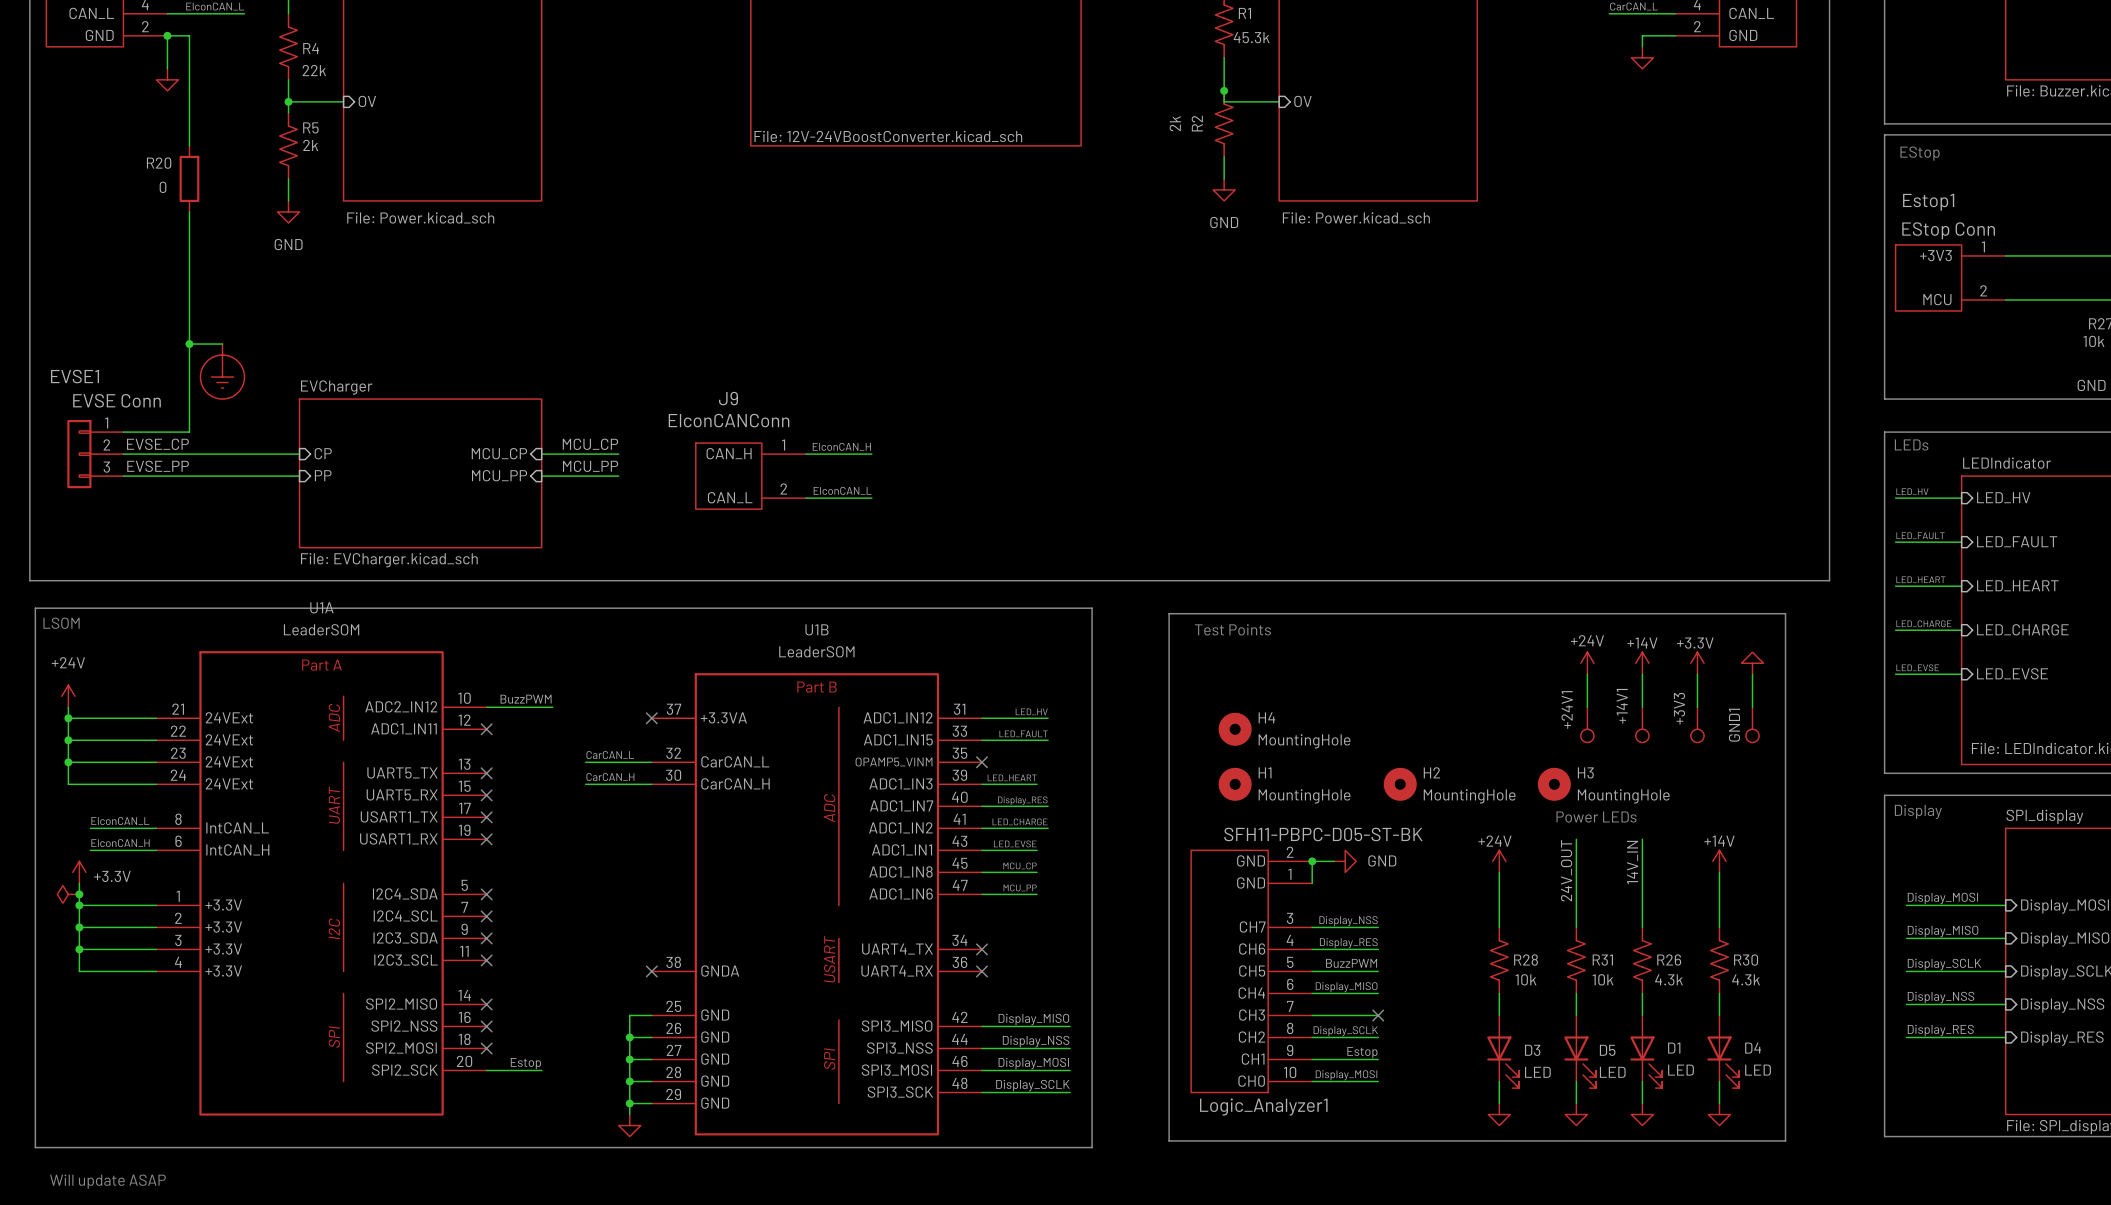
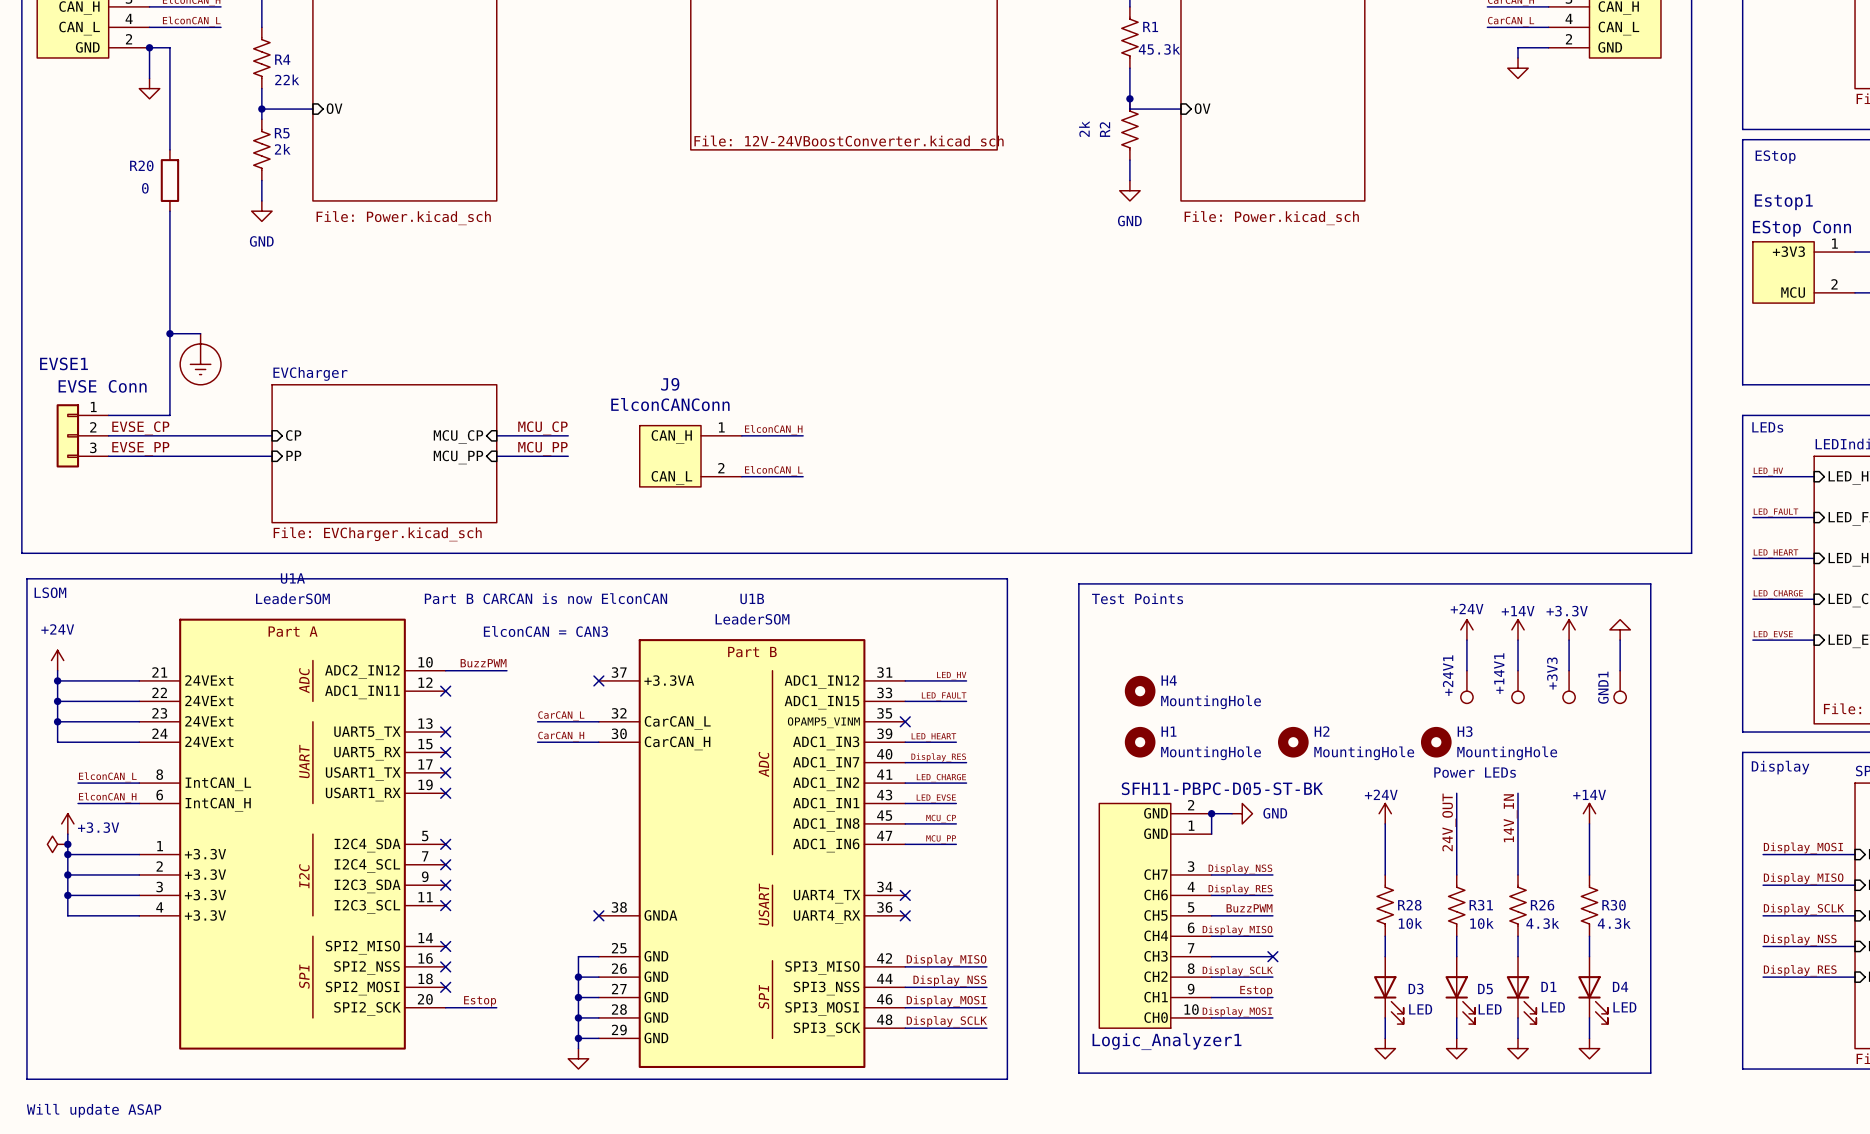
text: none -> Part B CARCAN is now ElconCAN (545, 598)
text: none -> ElconCAN = CAN3 (545, 631)

